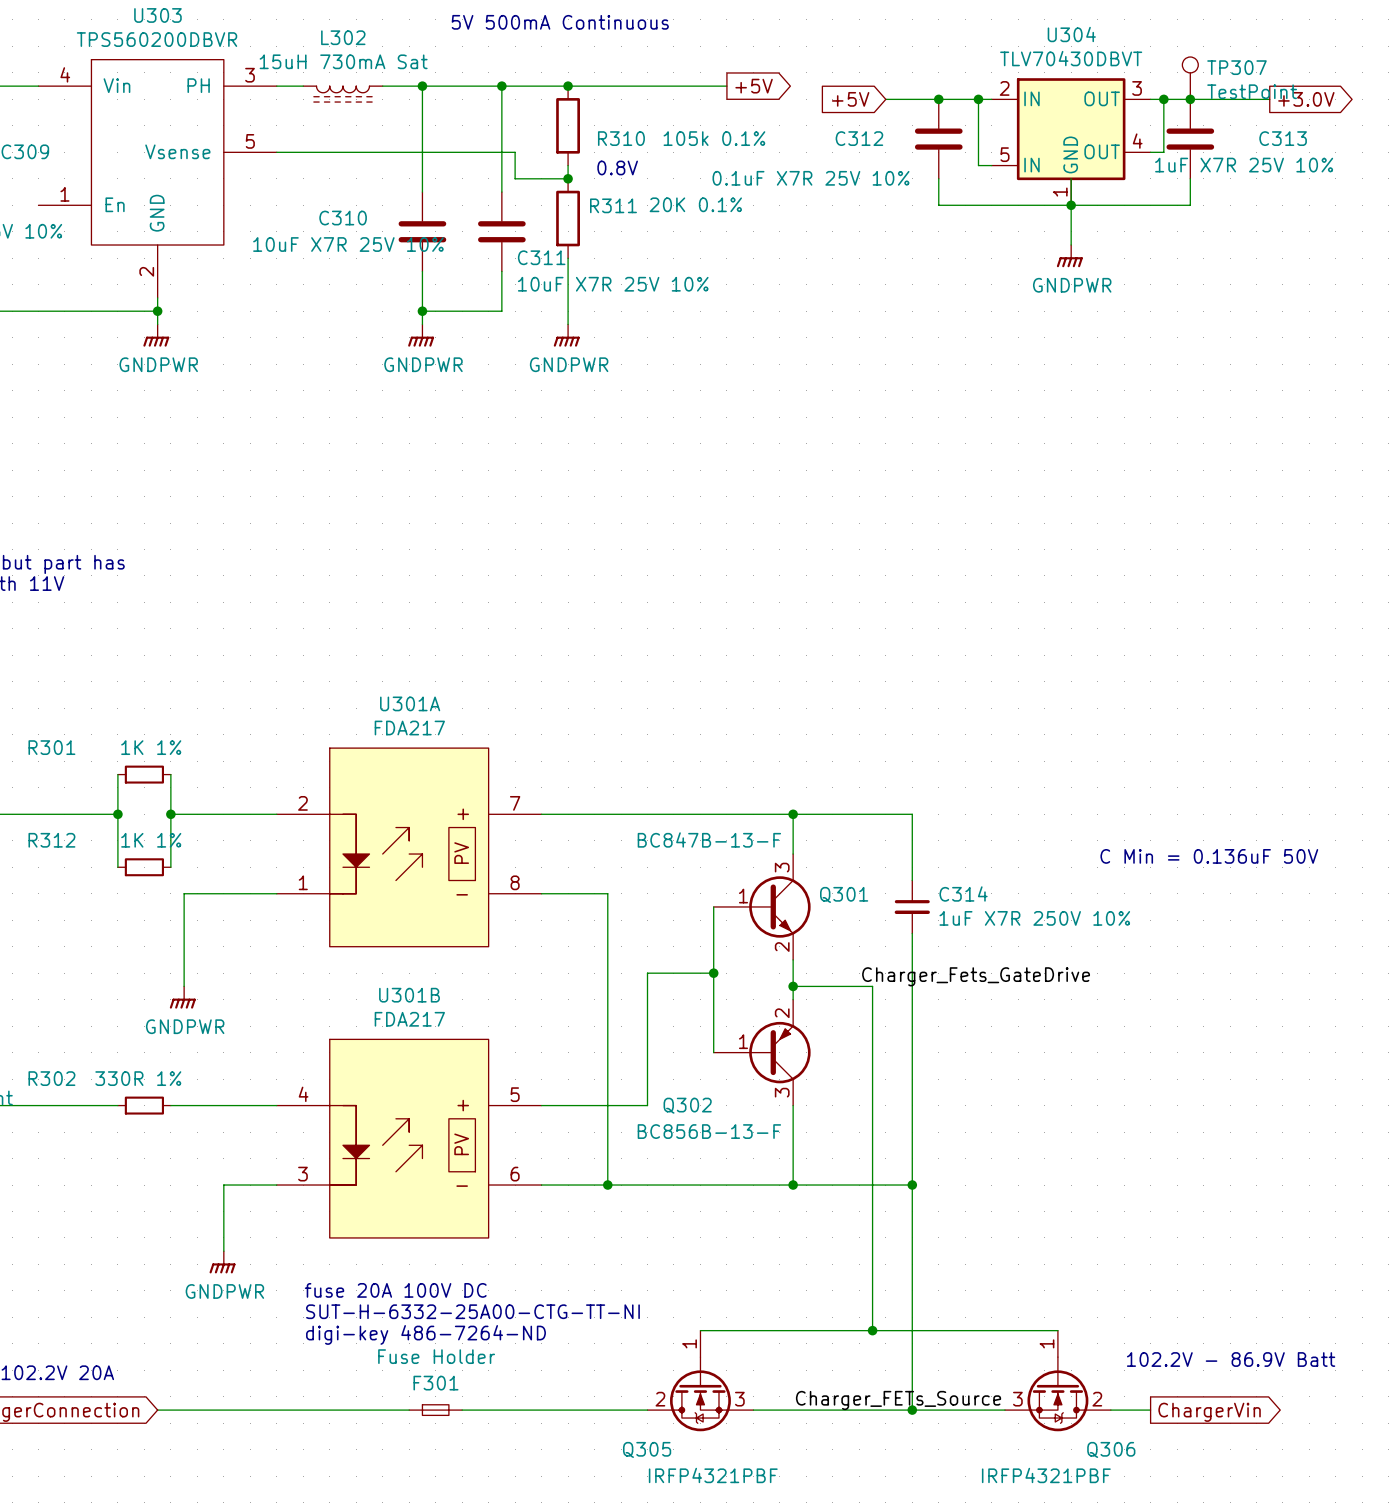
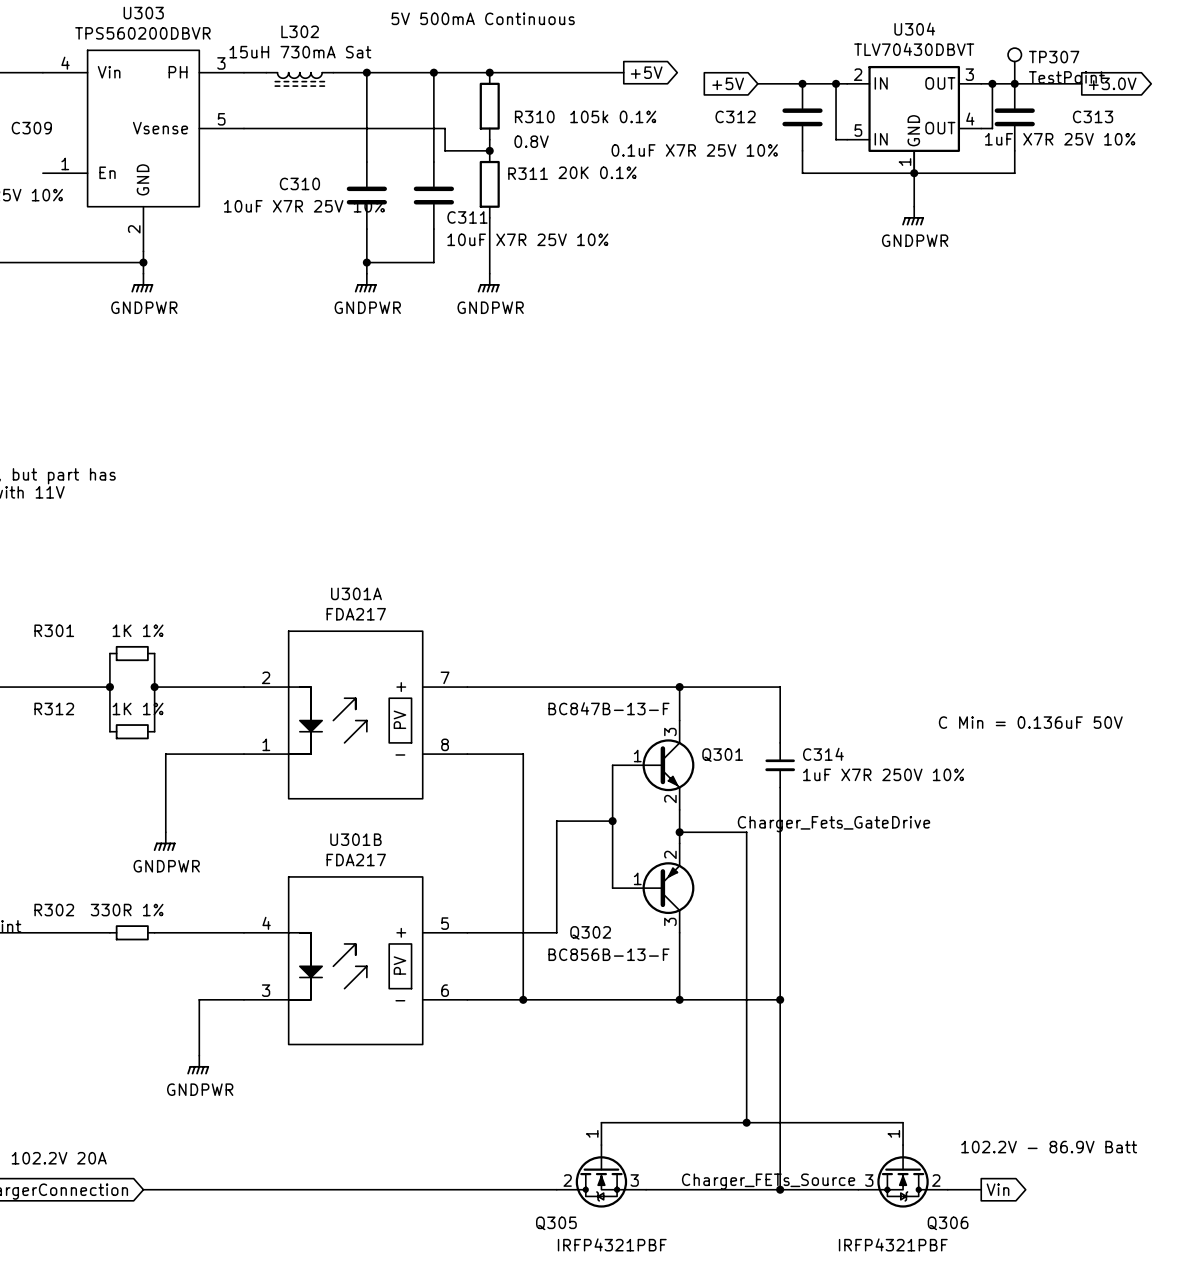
text: fuse 20A 100V DC (395, 1290) -> none
text: SUT-H-6332-25A00-CTG-TT-NI (472, 1311) -> none
text: digi-key 486-7264-ND (426, 1334) -> none
F301: Fuse Holder (435, 1410) -> none
global label: ChargerVin (1209, 1412) -> Vin (998, 1189)

